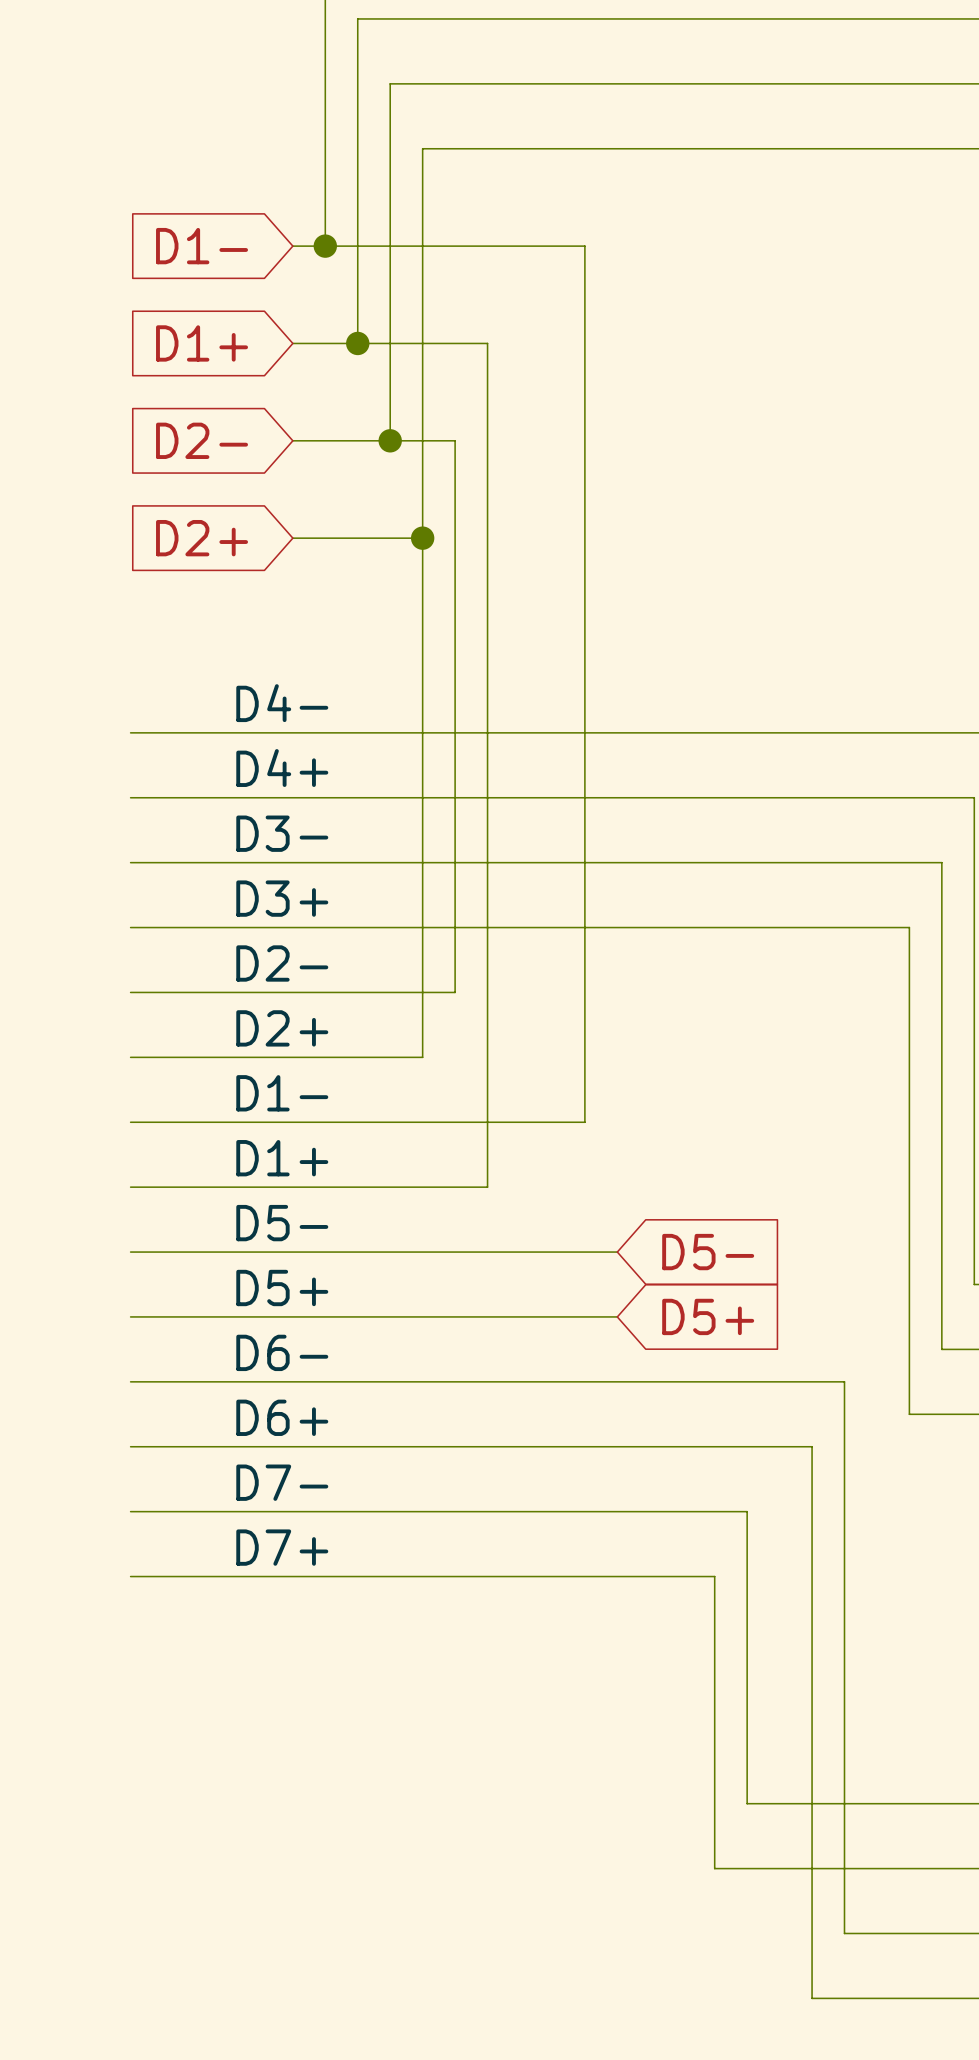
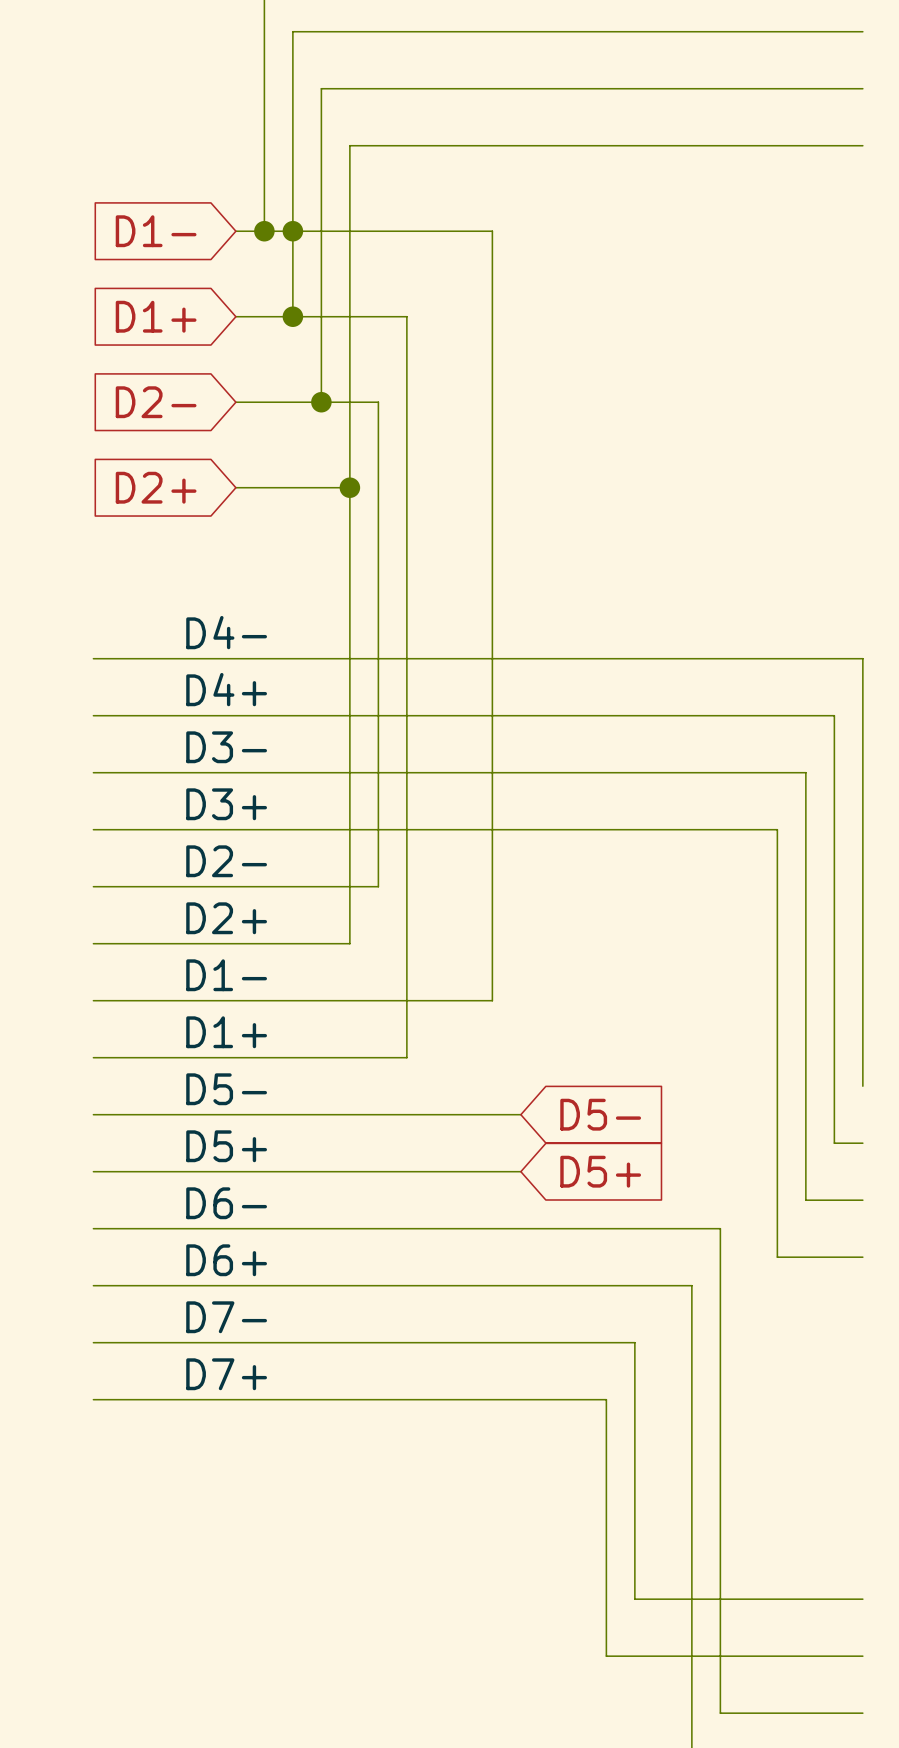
junction: none -> (292, 231)

